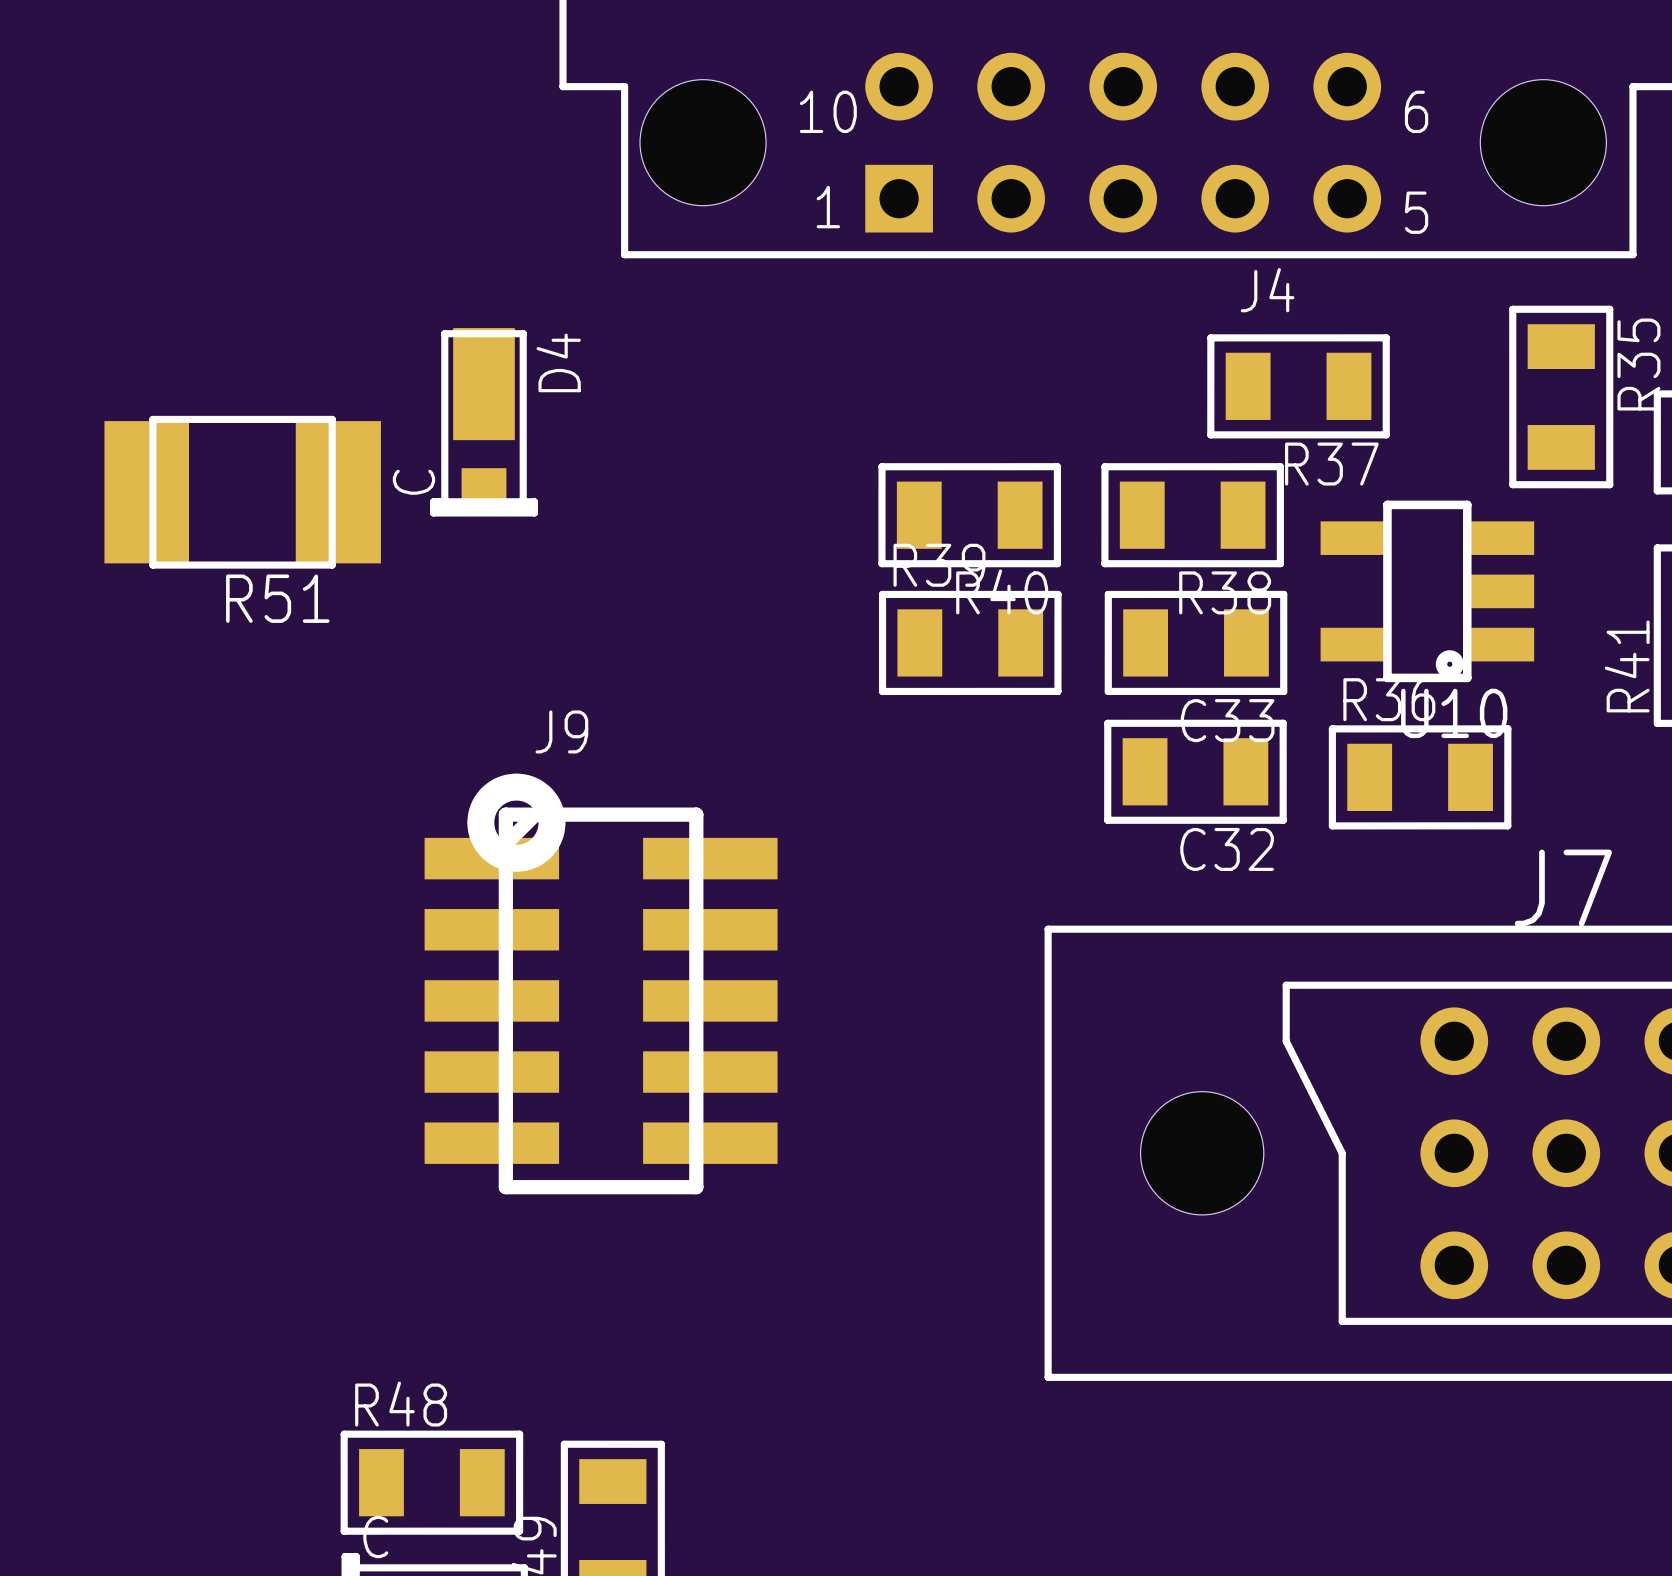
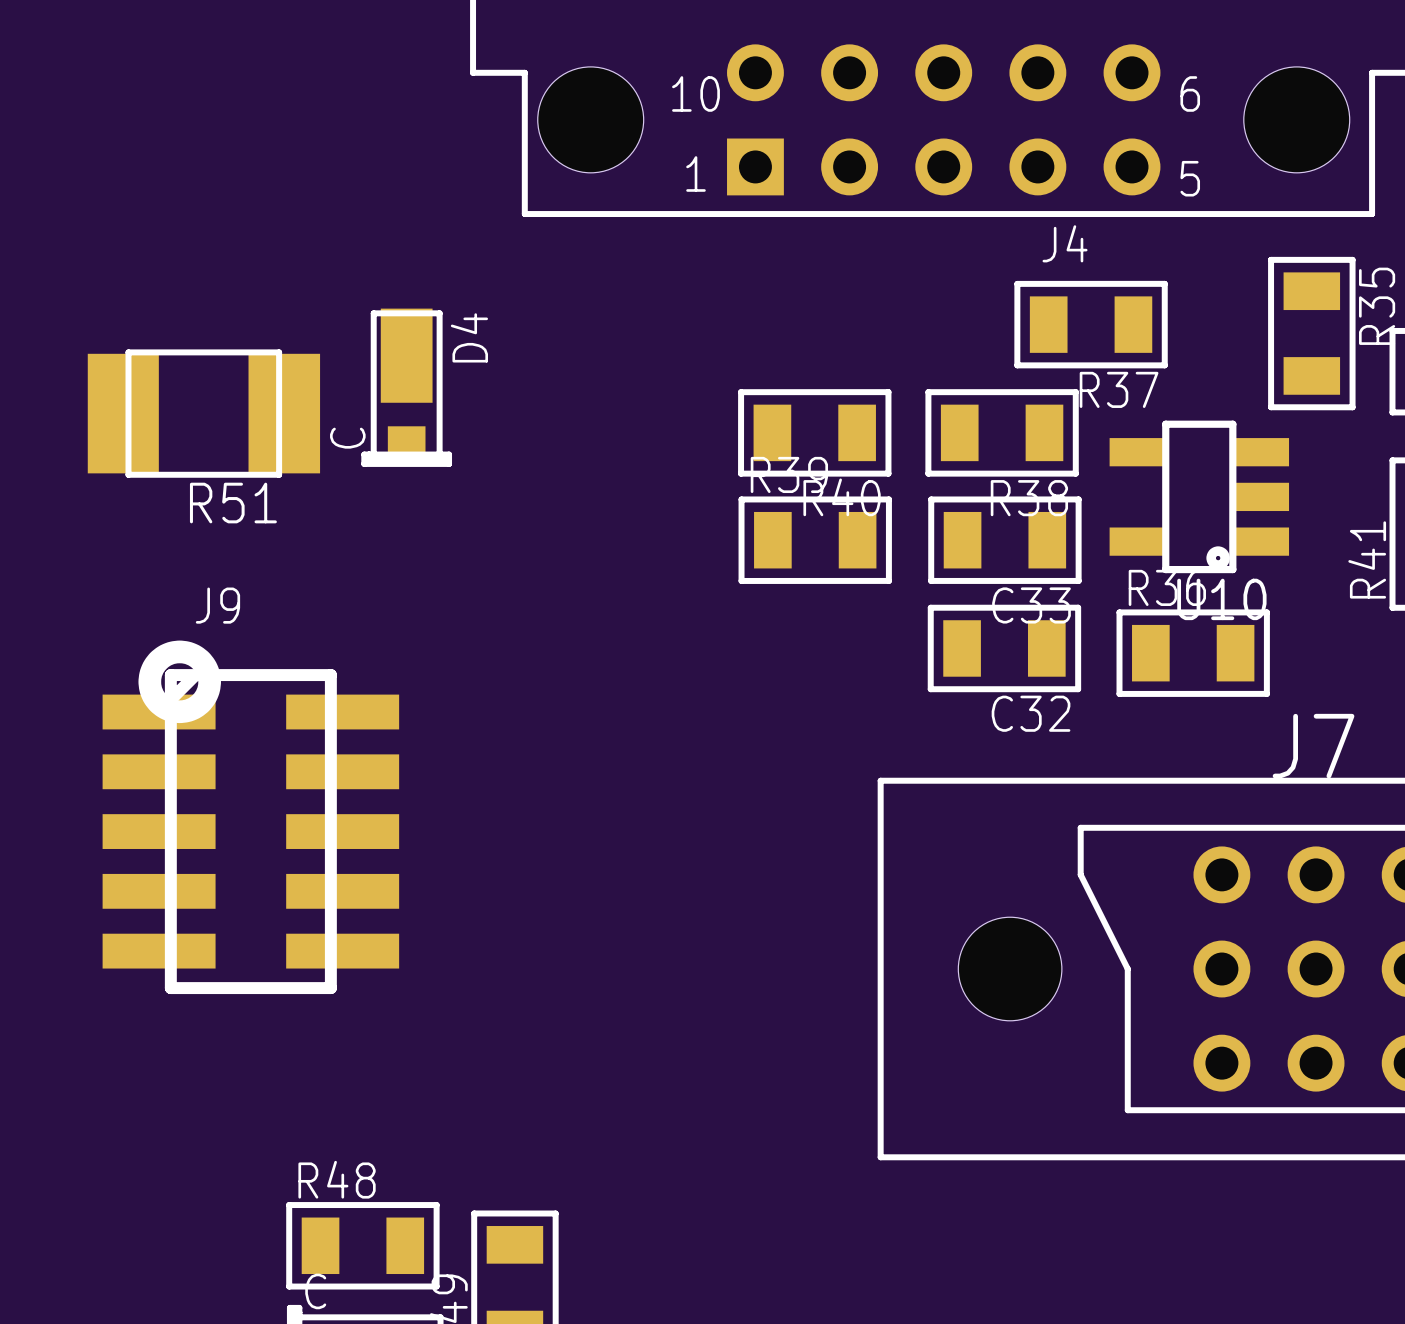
D4 position: (484, 422) -> (406, 387)
J9 position: (601, 983) -> (250, 817)

